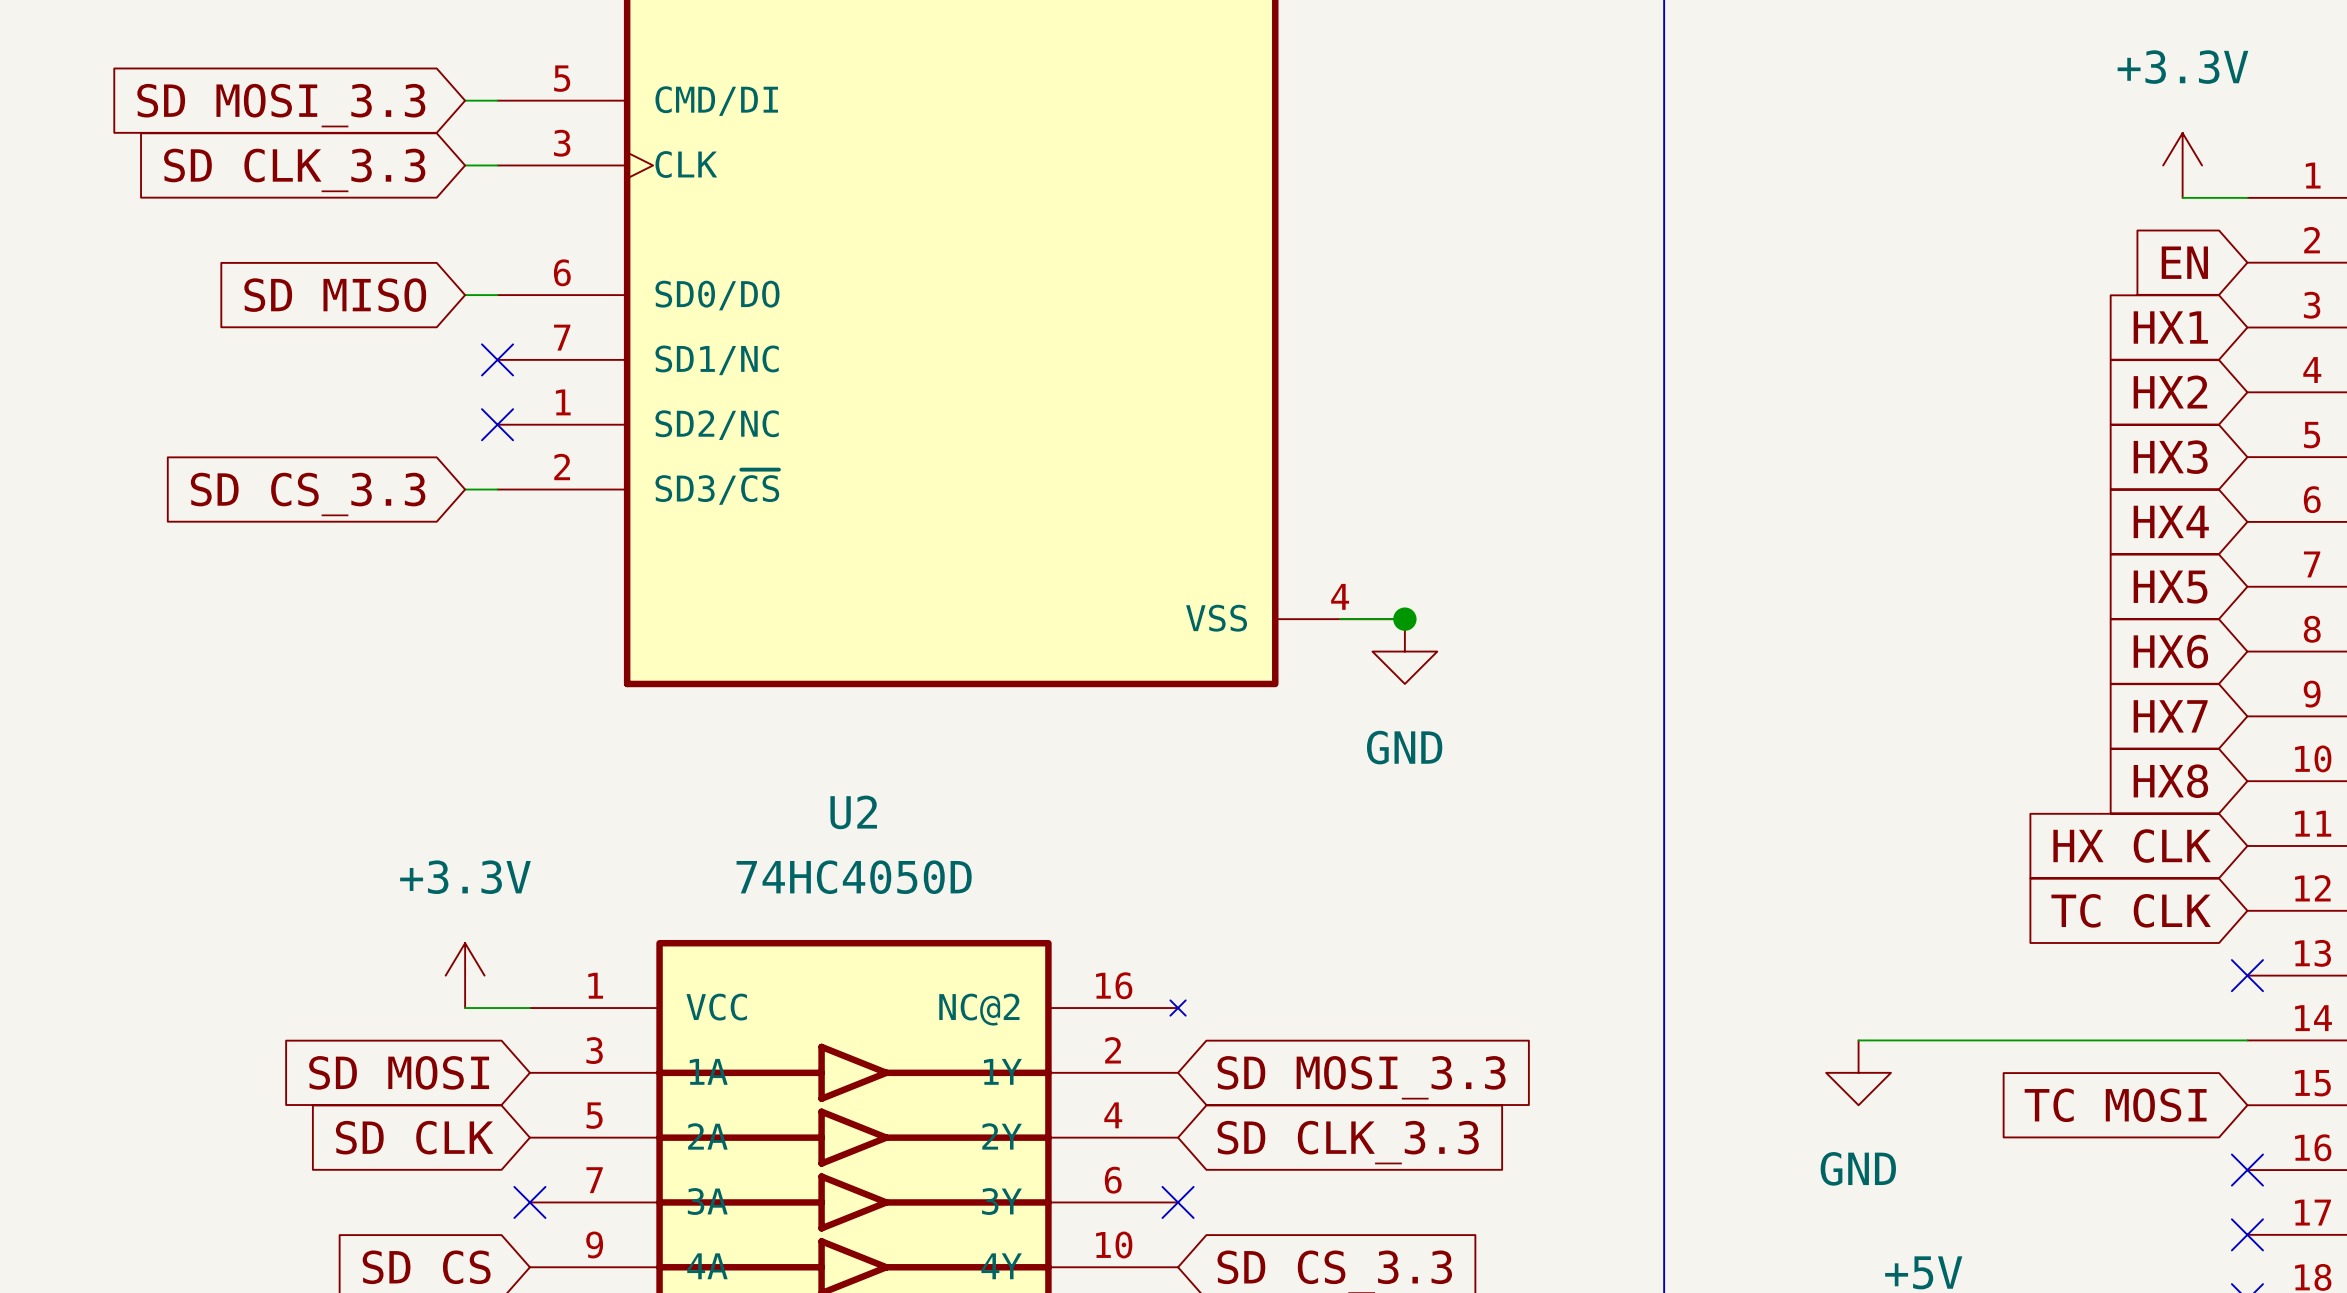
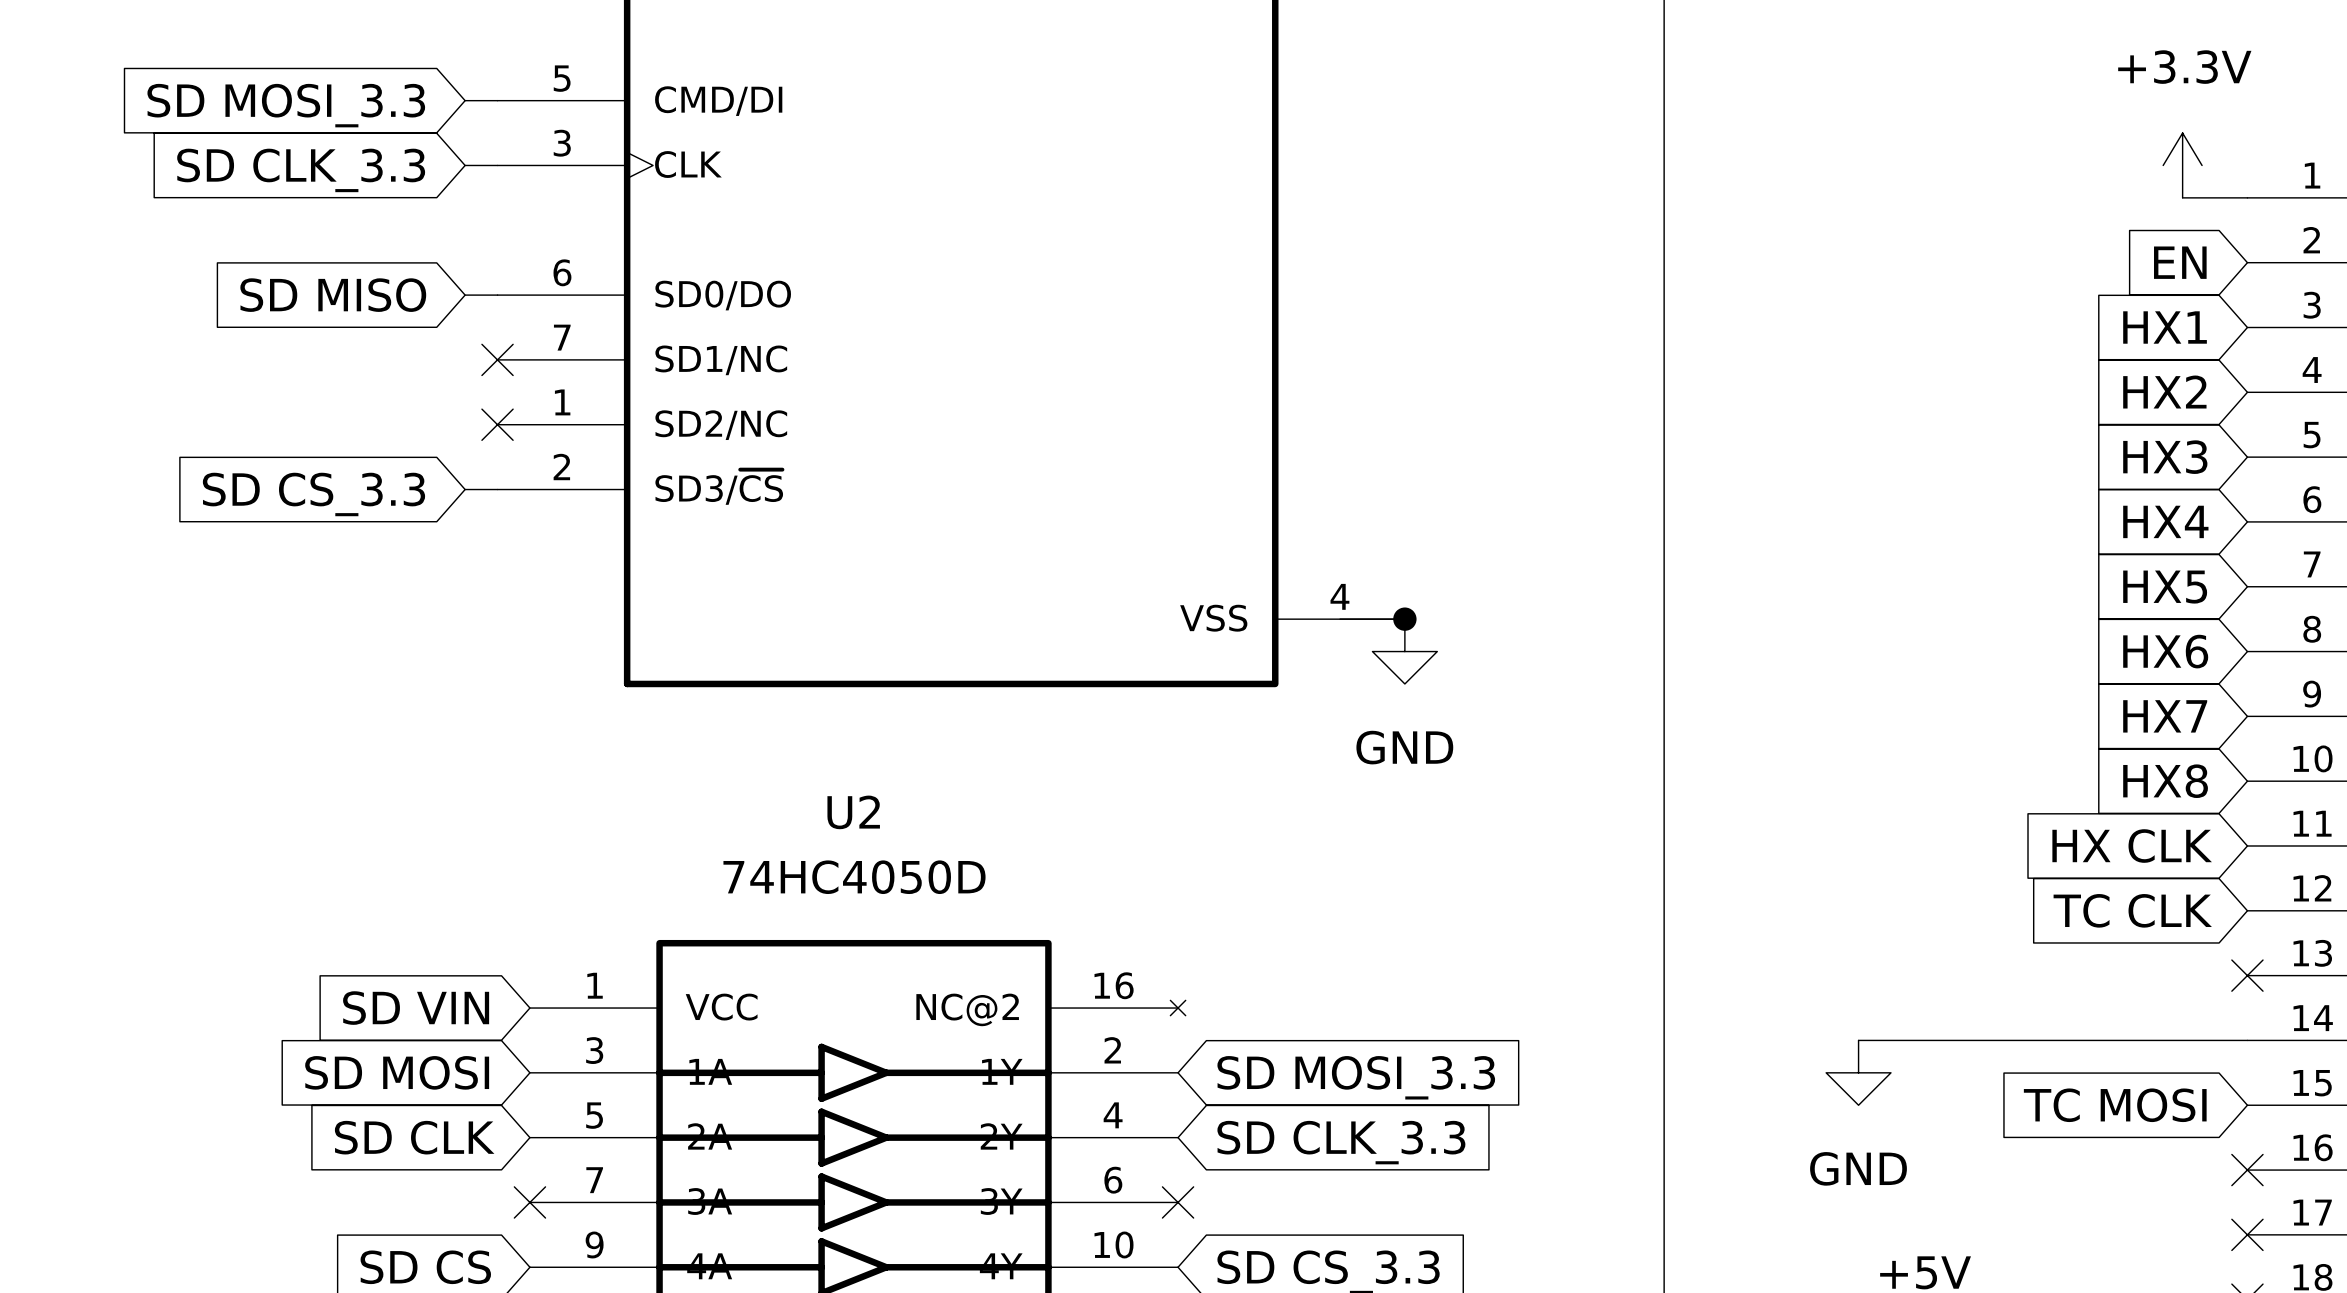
power symbol: +3.3V (465, 975) -> none
global label: none -> SD VIN (416, 1008)
wire: (465, 1008) (529, 1008) -> none

